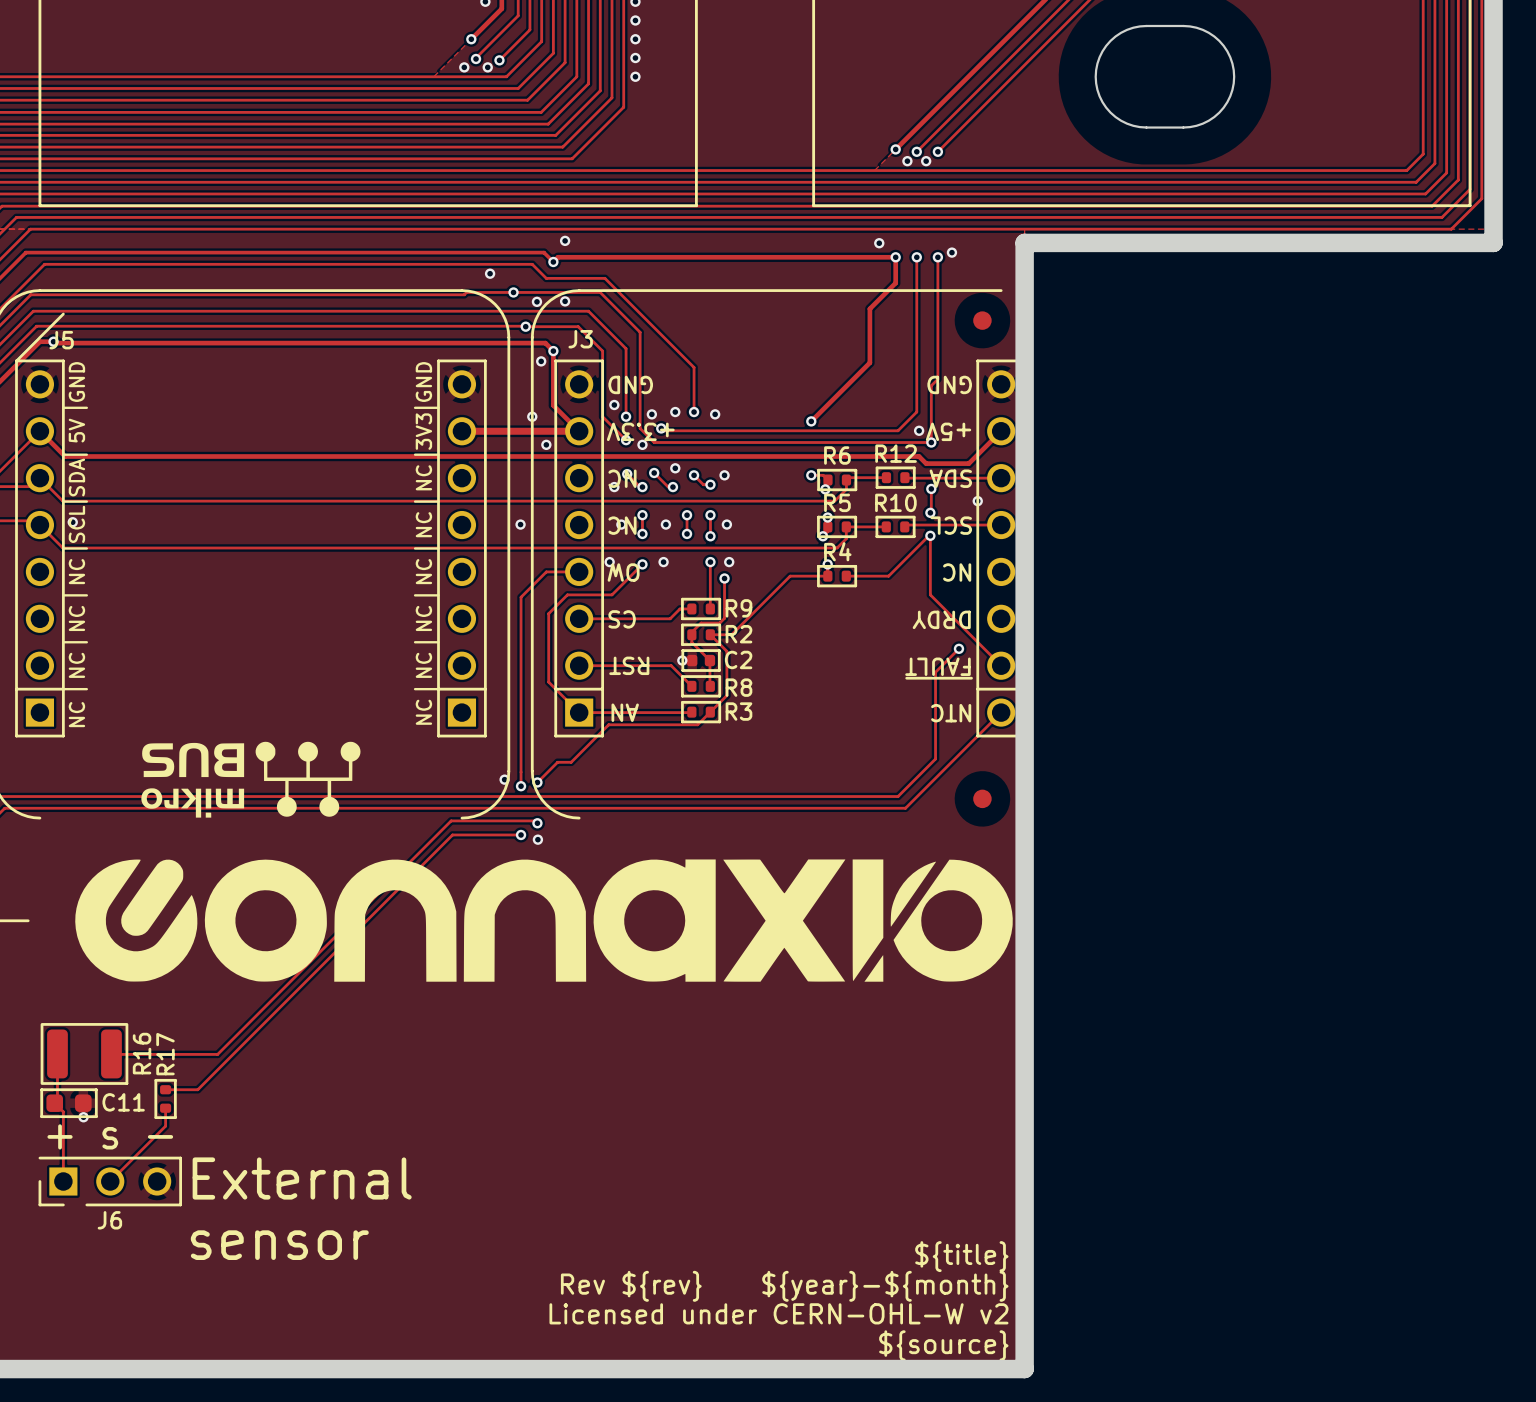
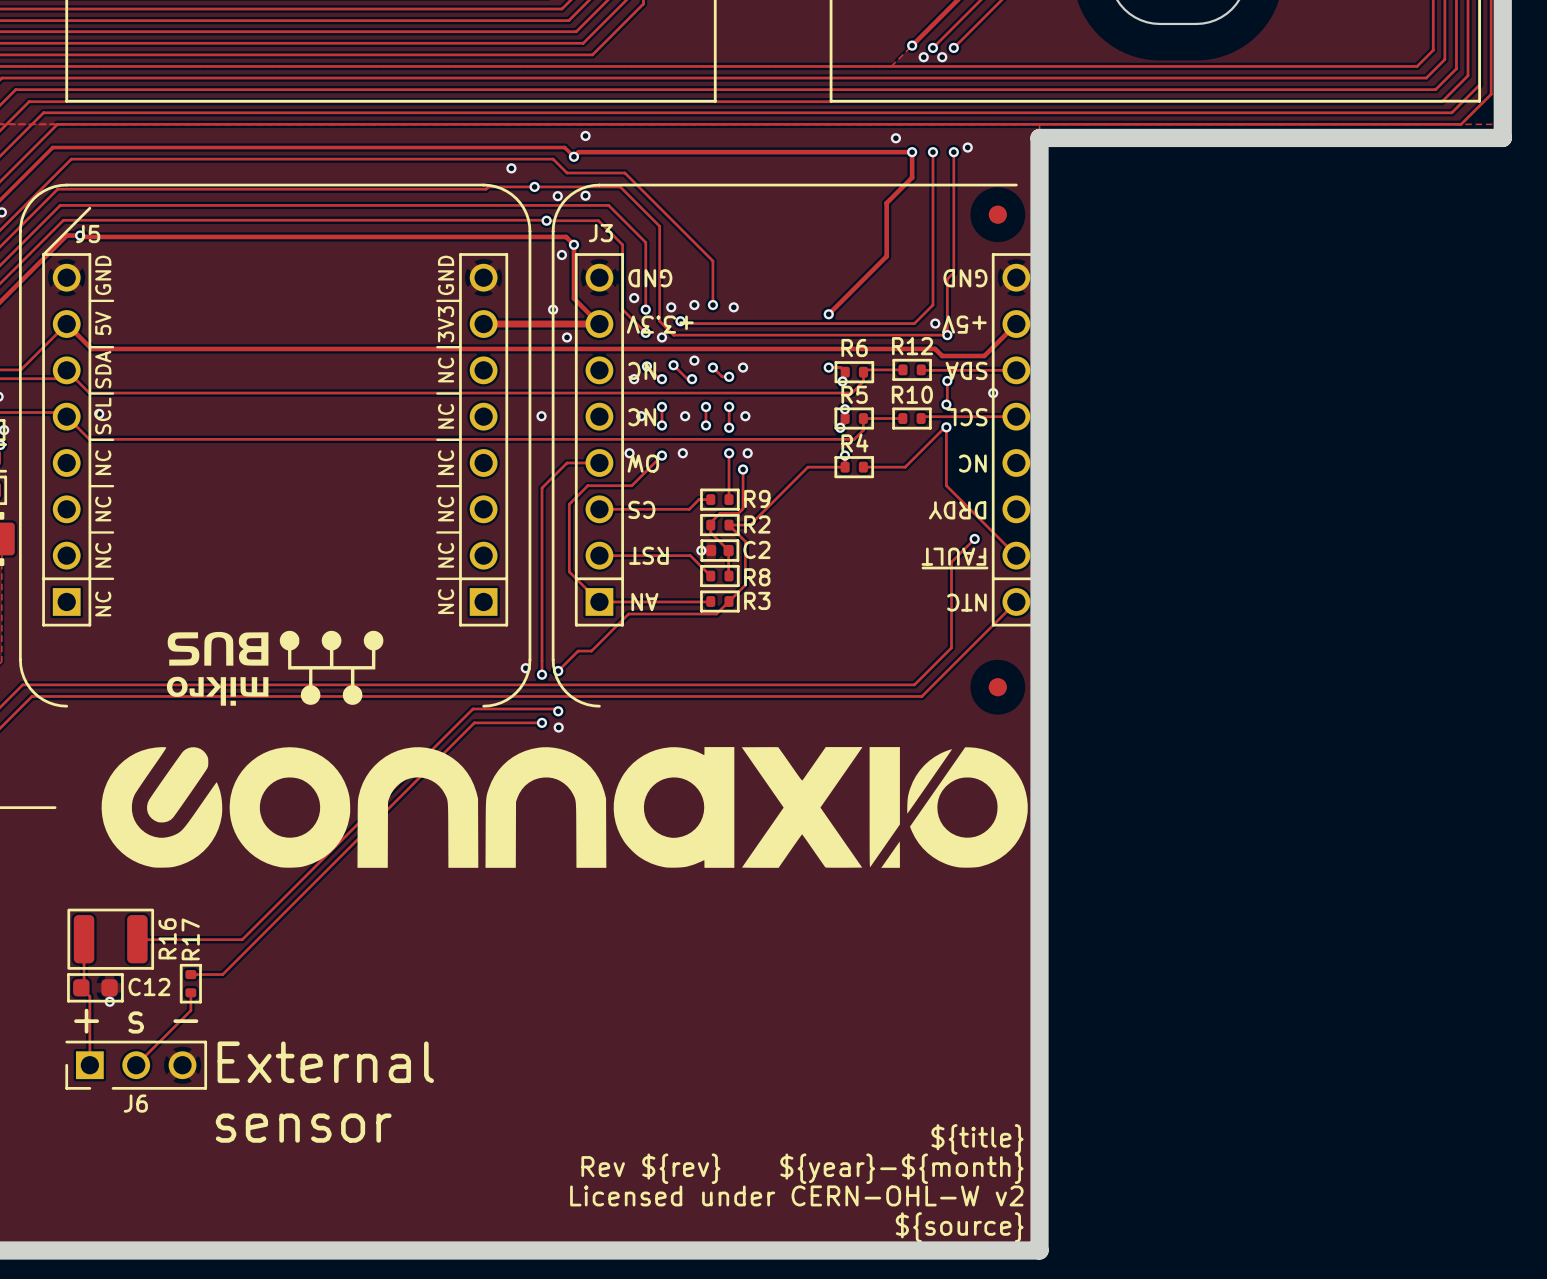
C11 name: C11 (123, 1102) -> C12 (149, 987)

